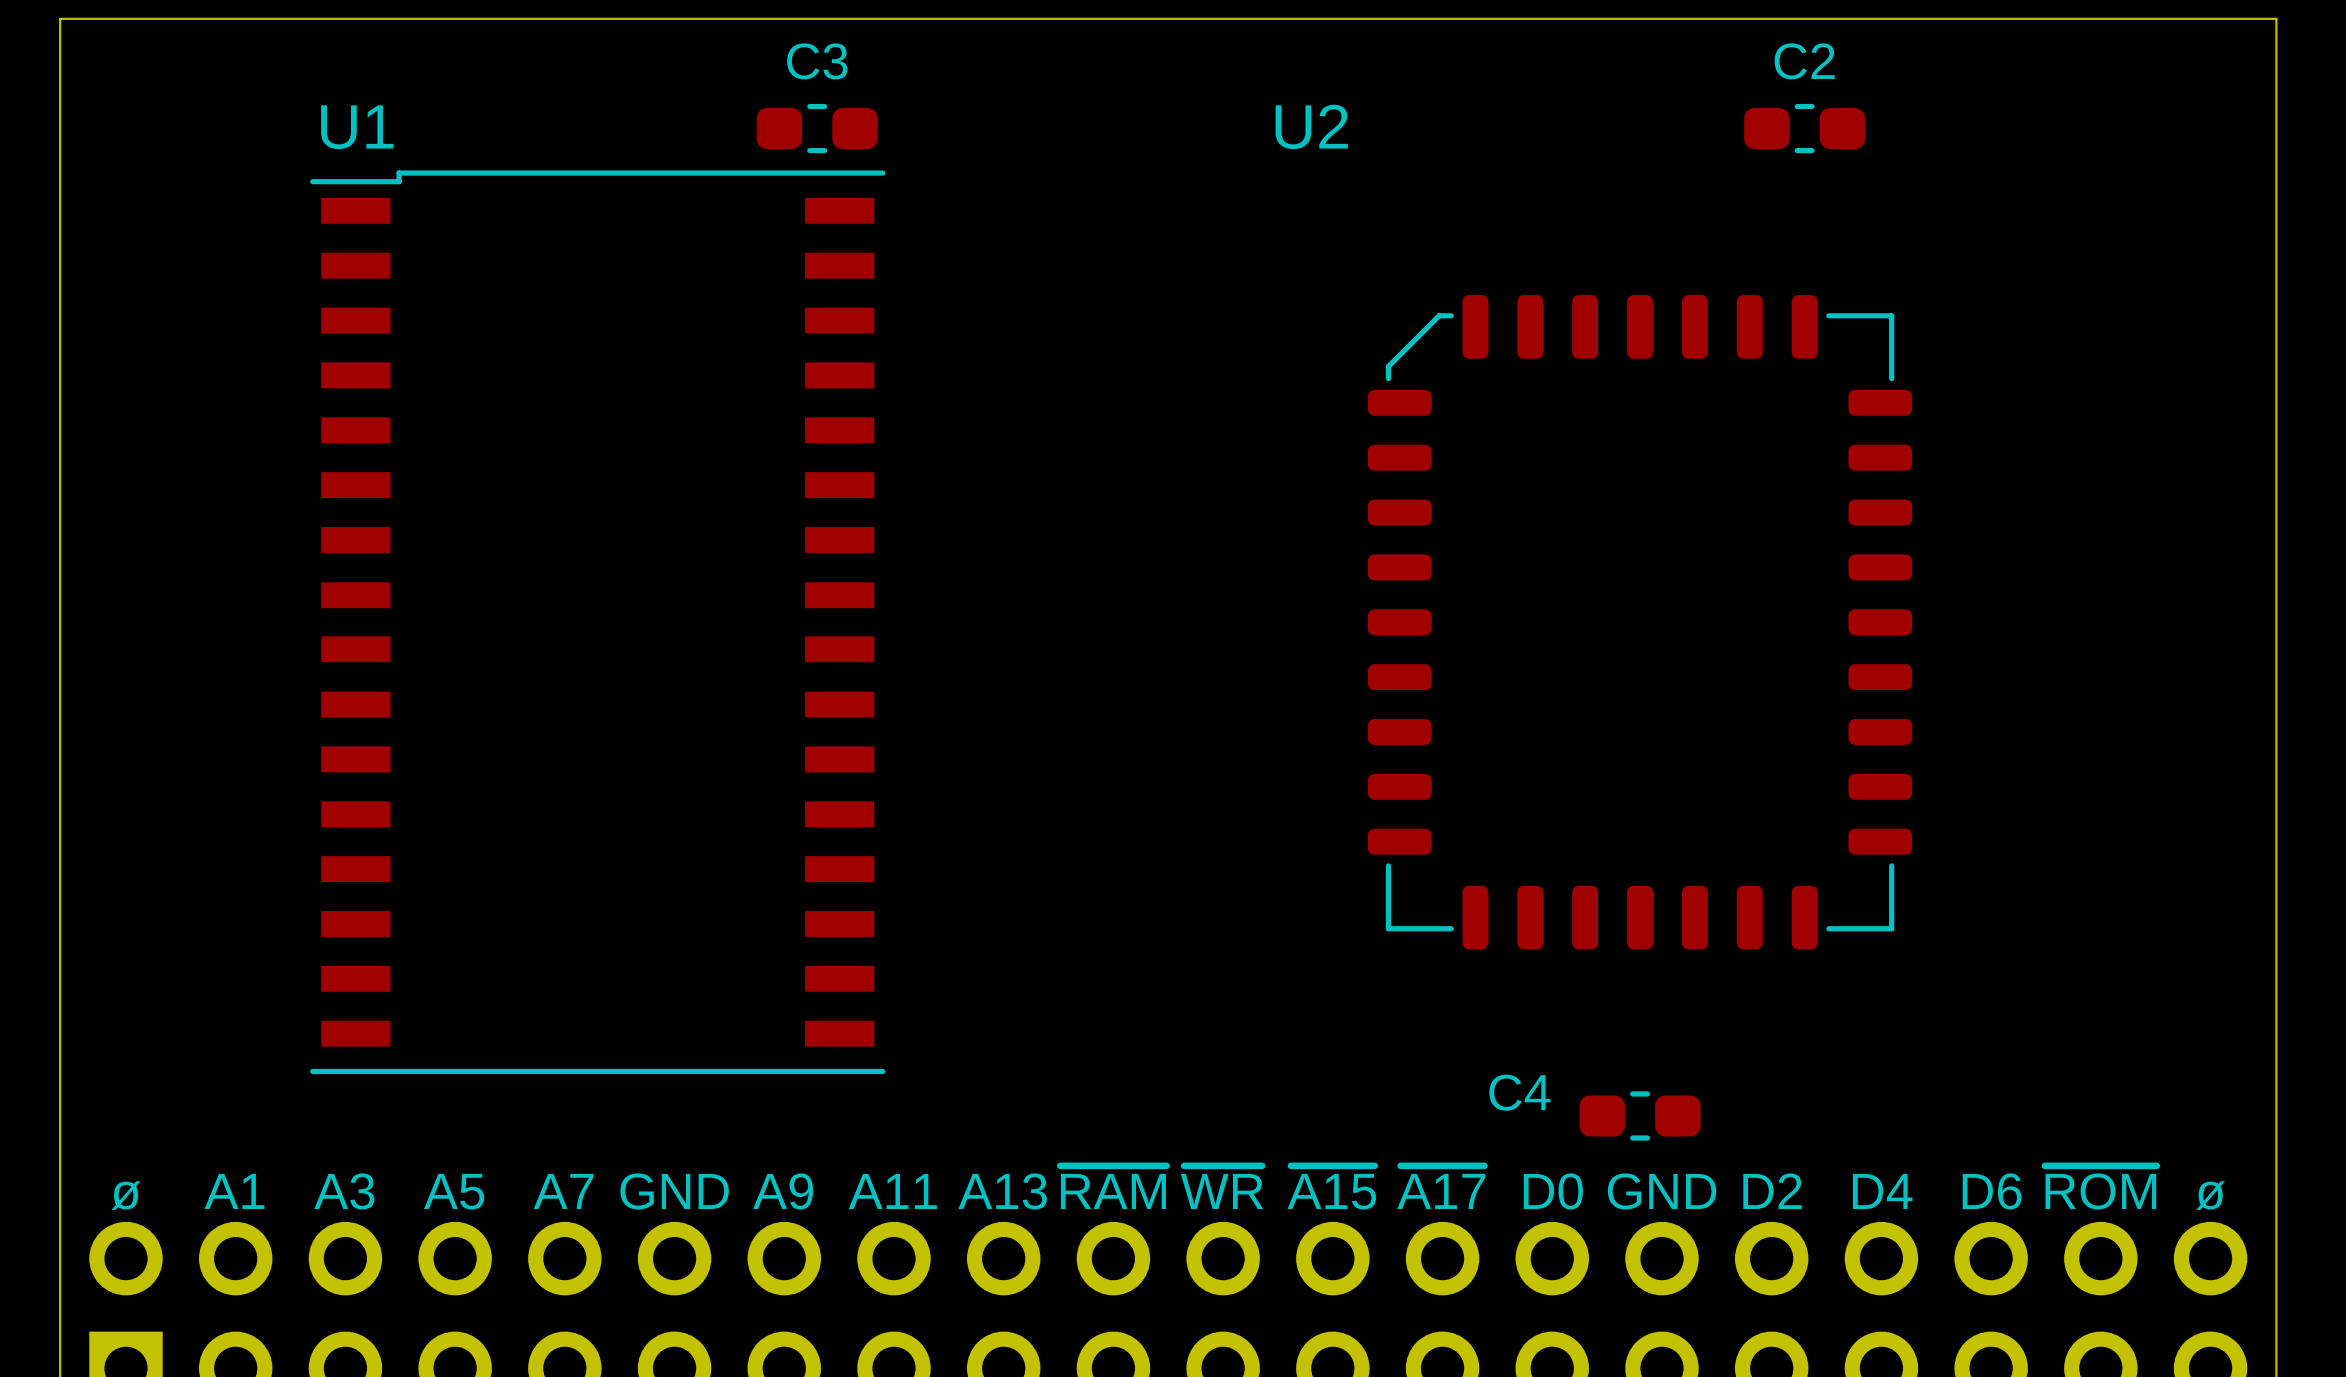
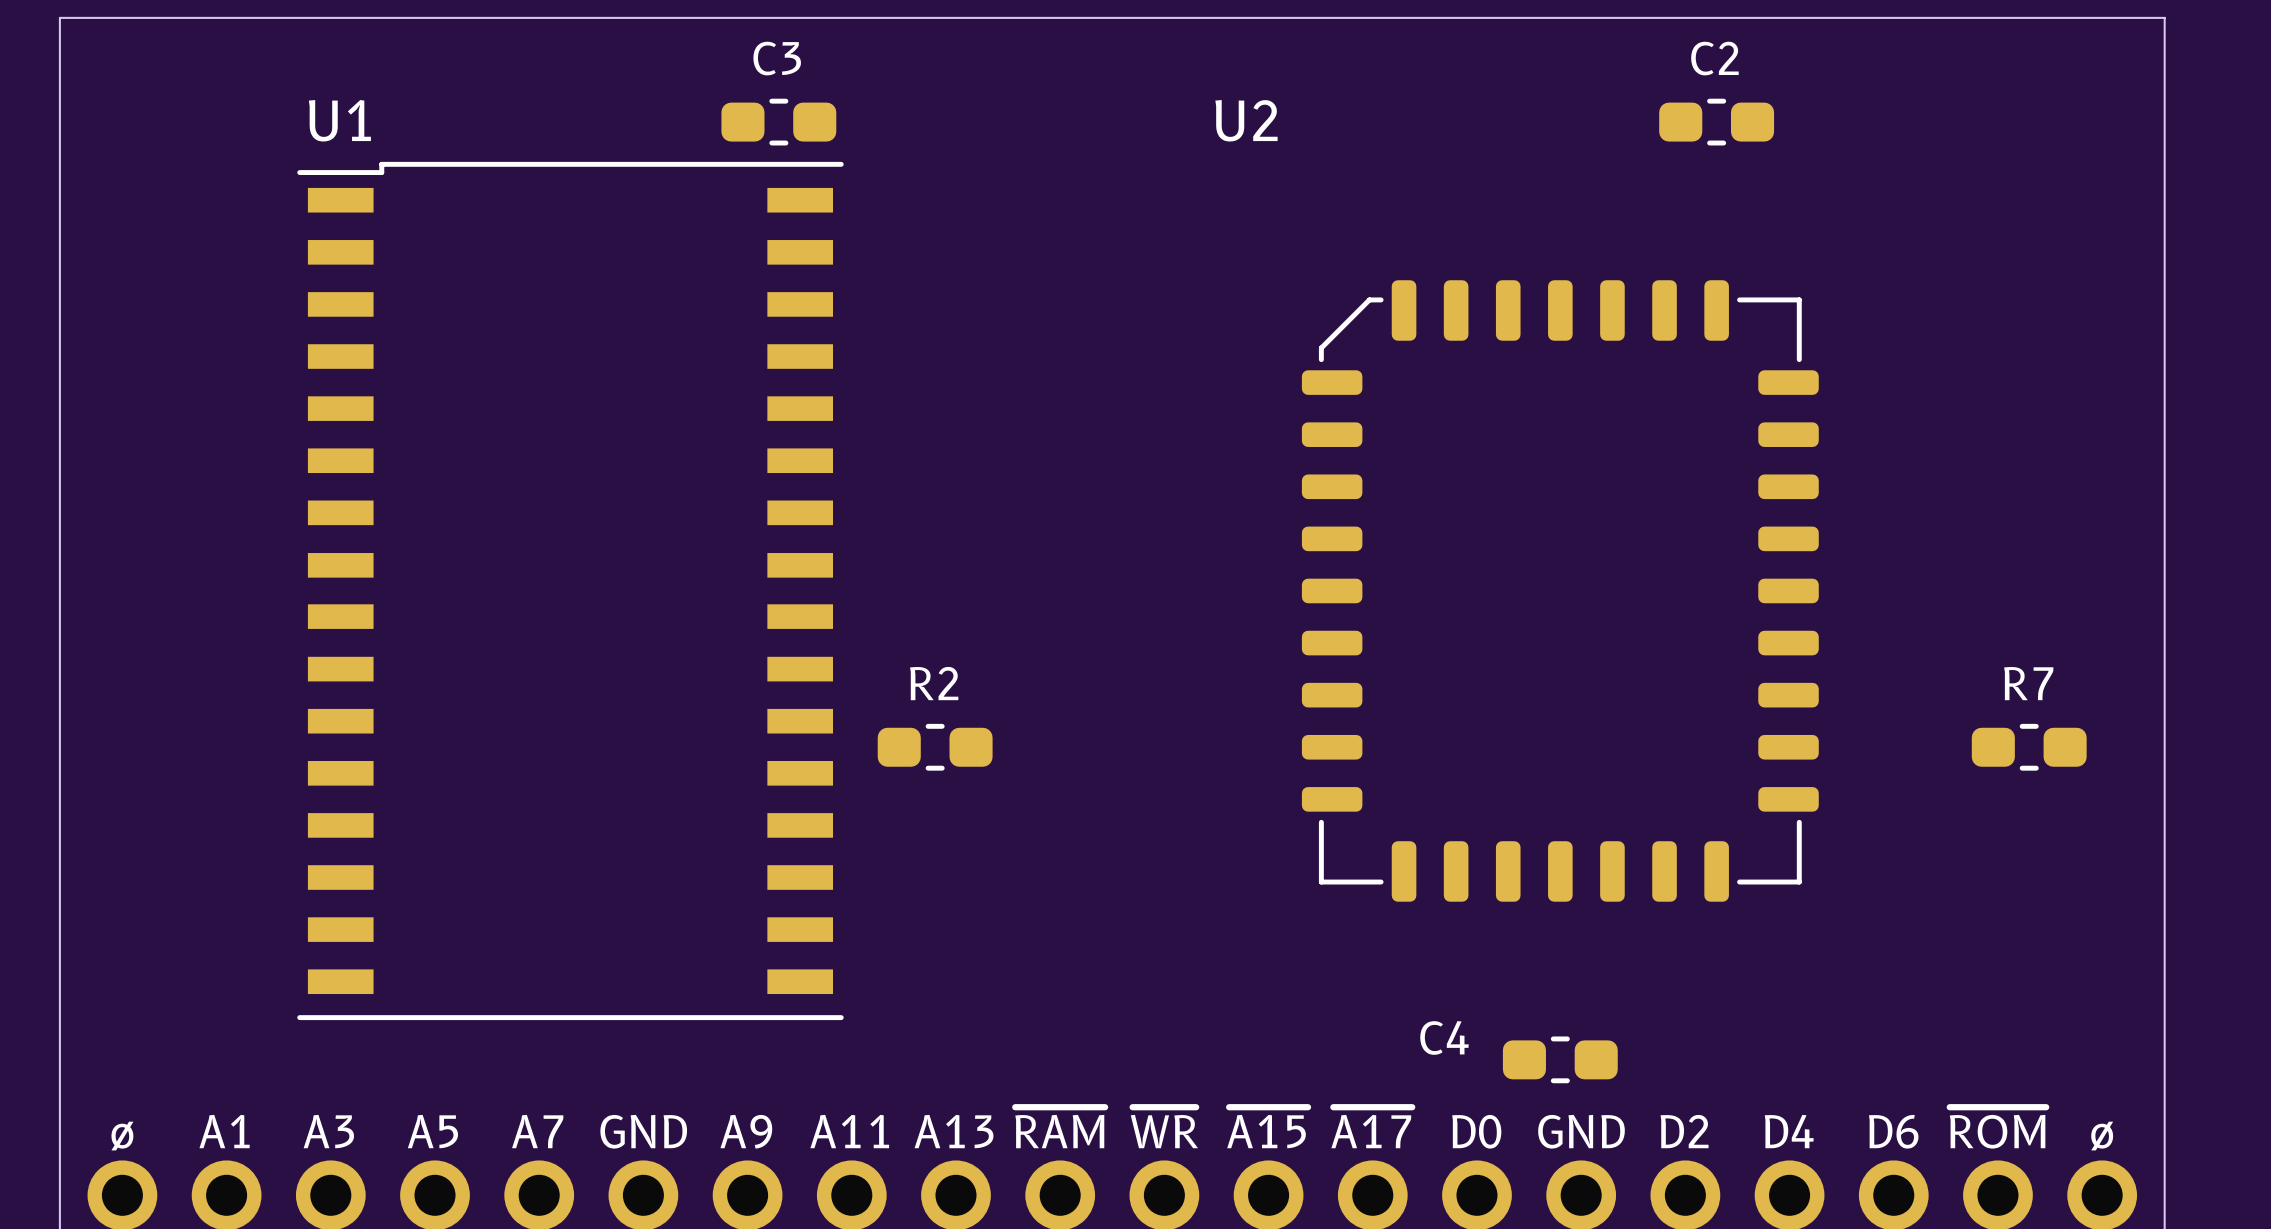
R2: none -> (935, 747)
R7: none -> (2029, 747)

